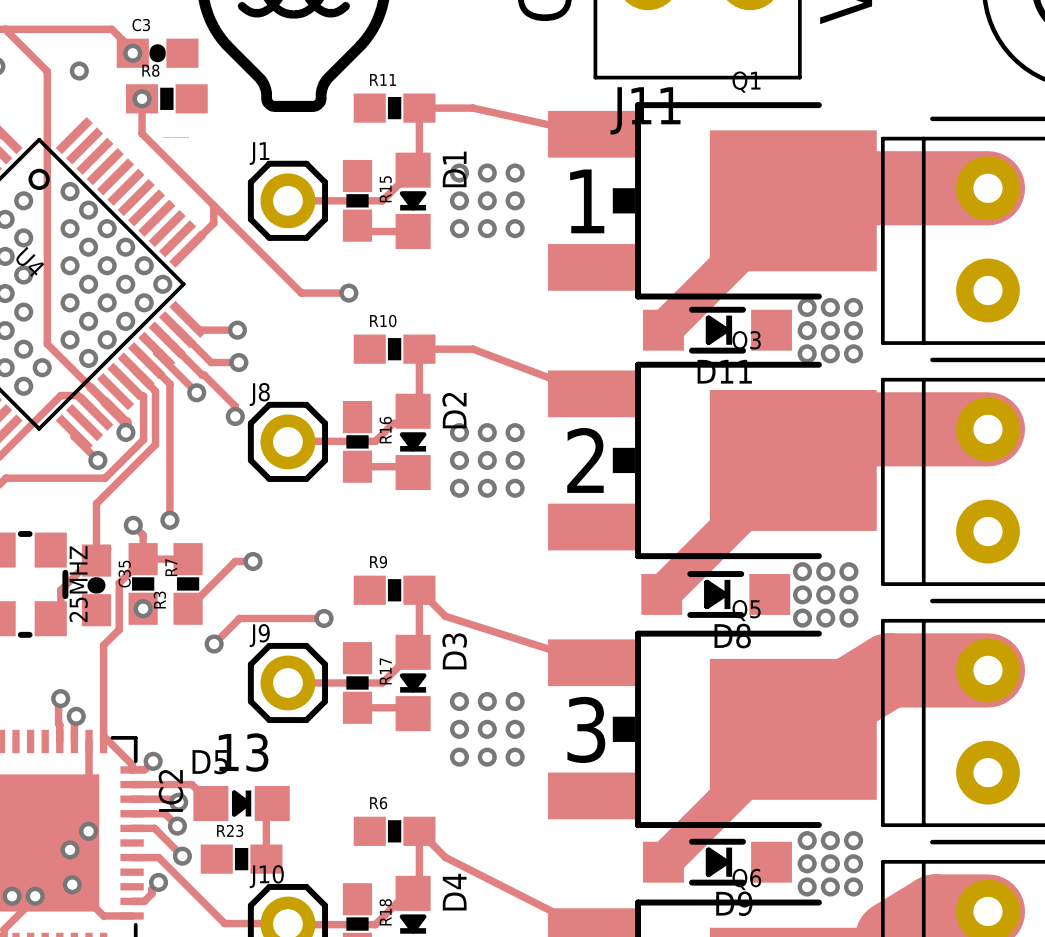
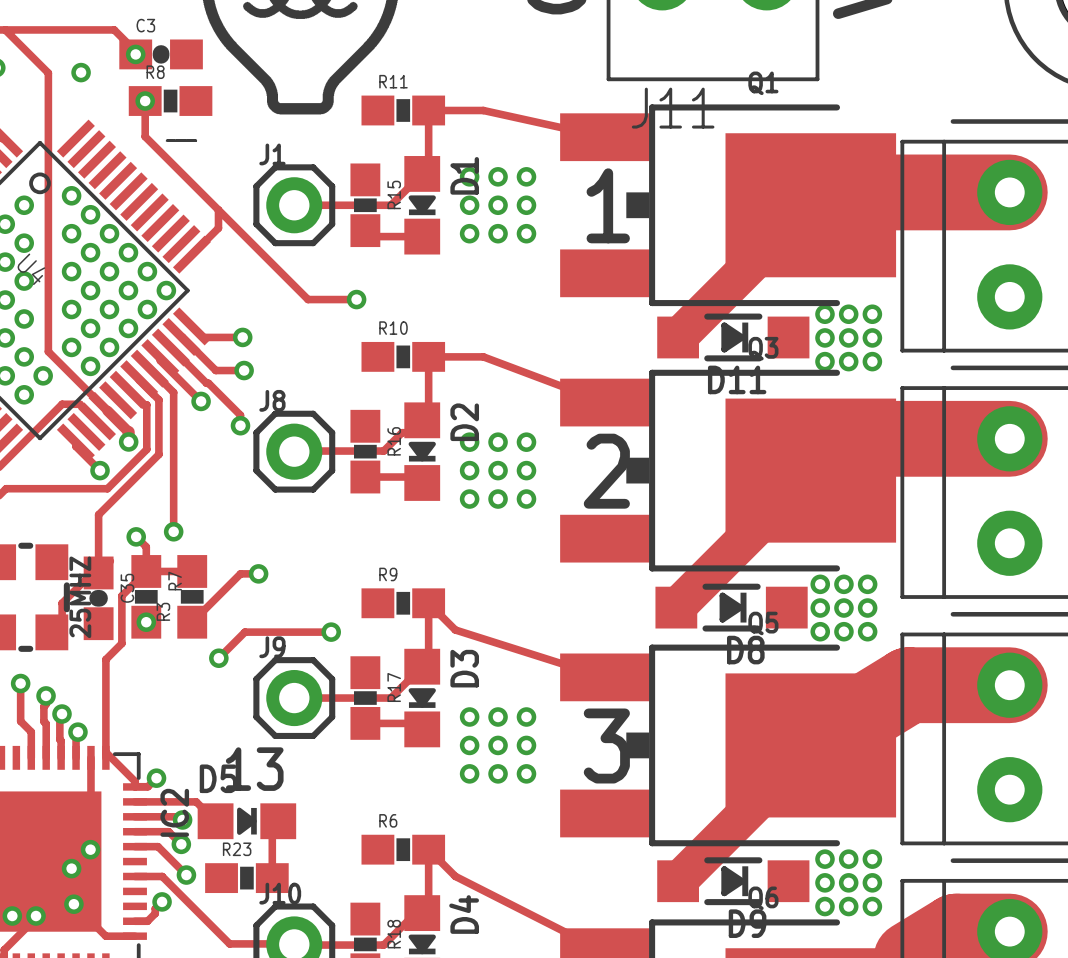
track: none -> (20, 683) (20, 721) (31, 731) (31, 757)
via: none -> (20, 683)
track: none -> (46, 695) (43, 721) (46, 723) (46, 757)
via: none -> (46, 695)

